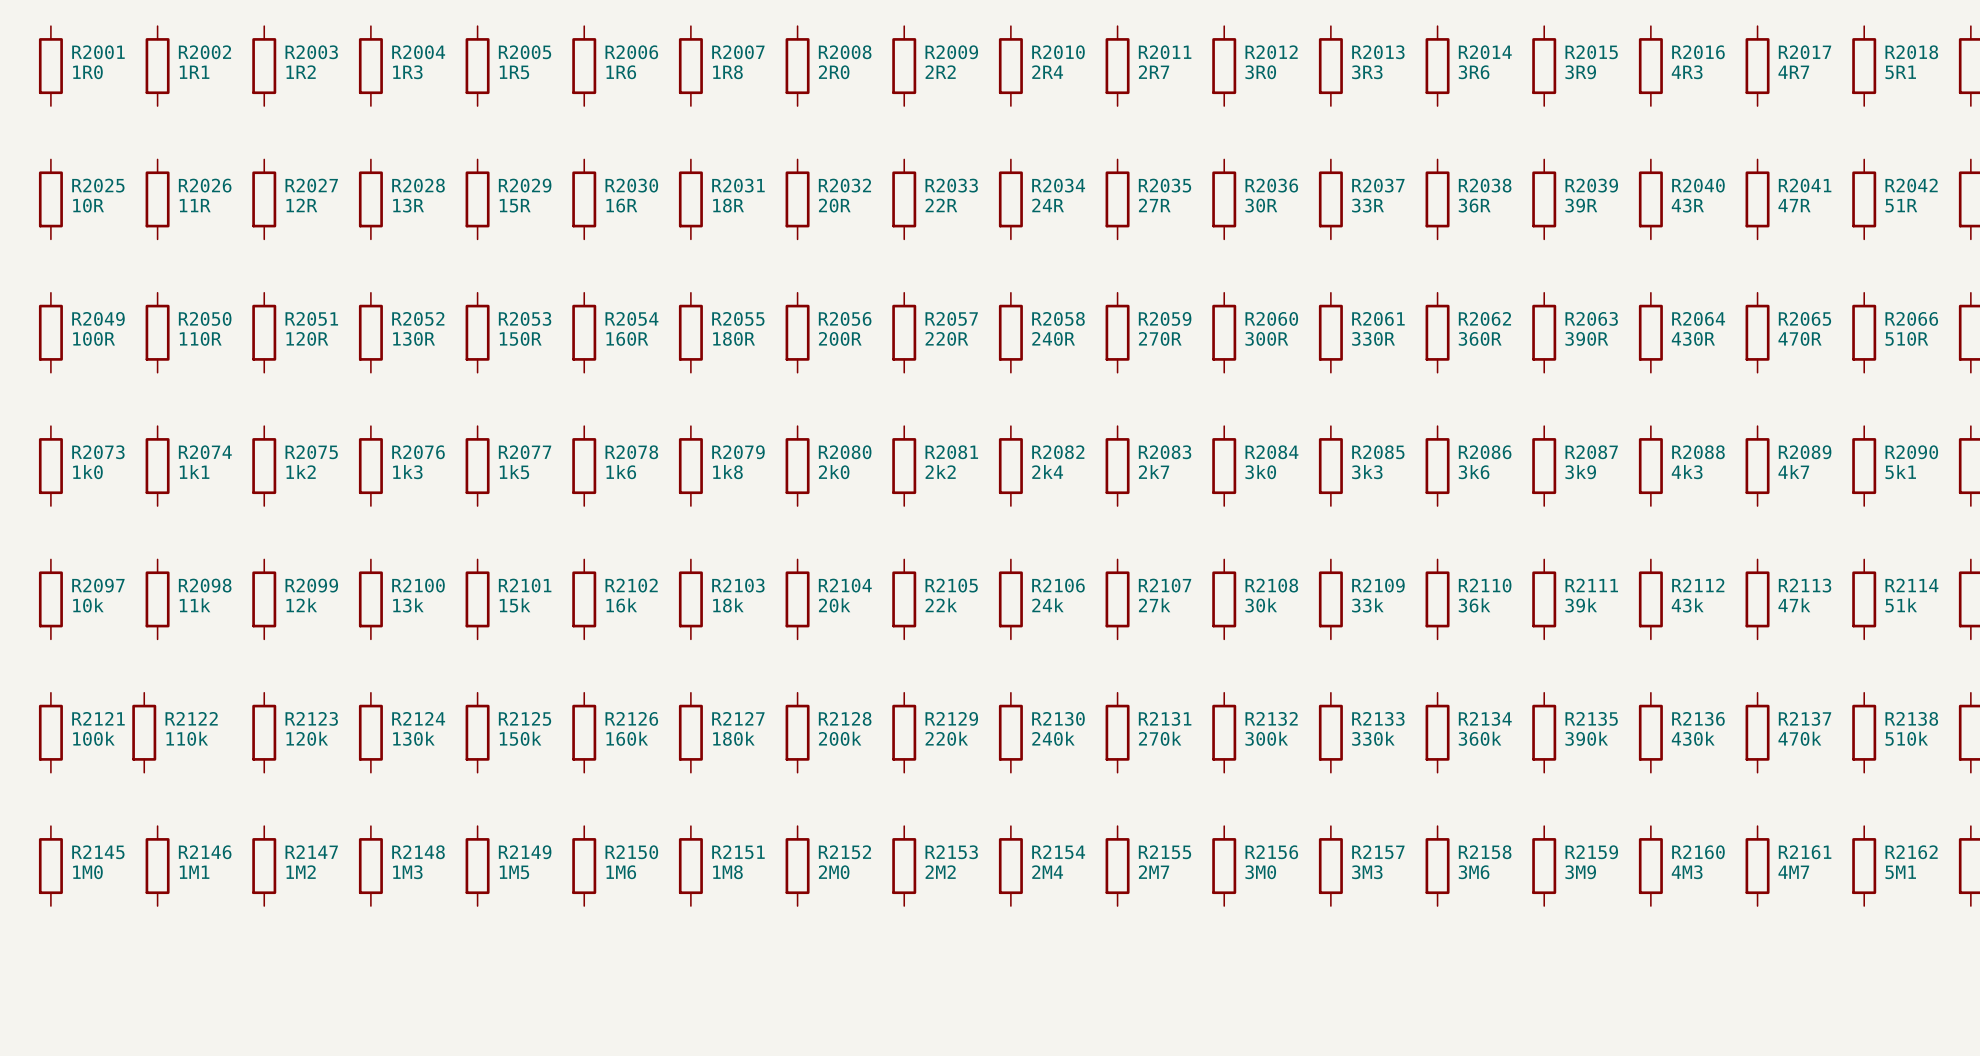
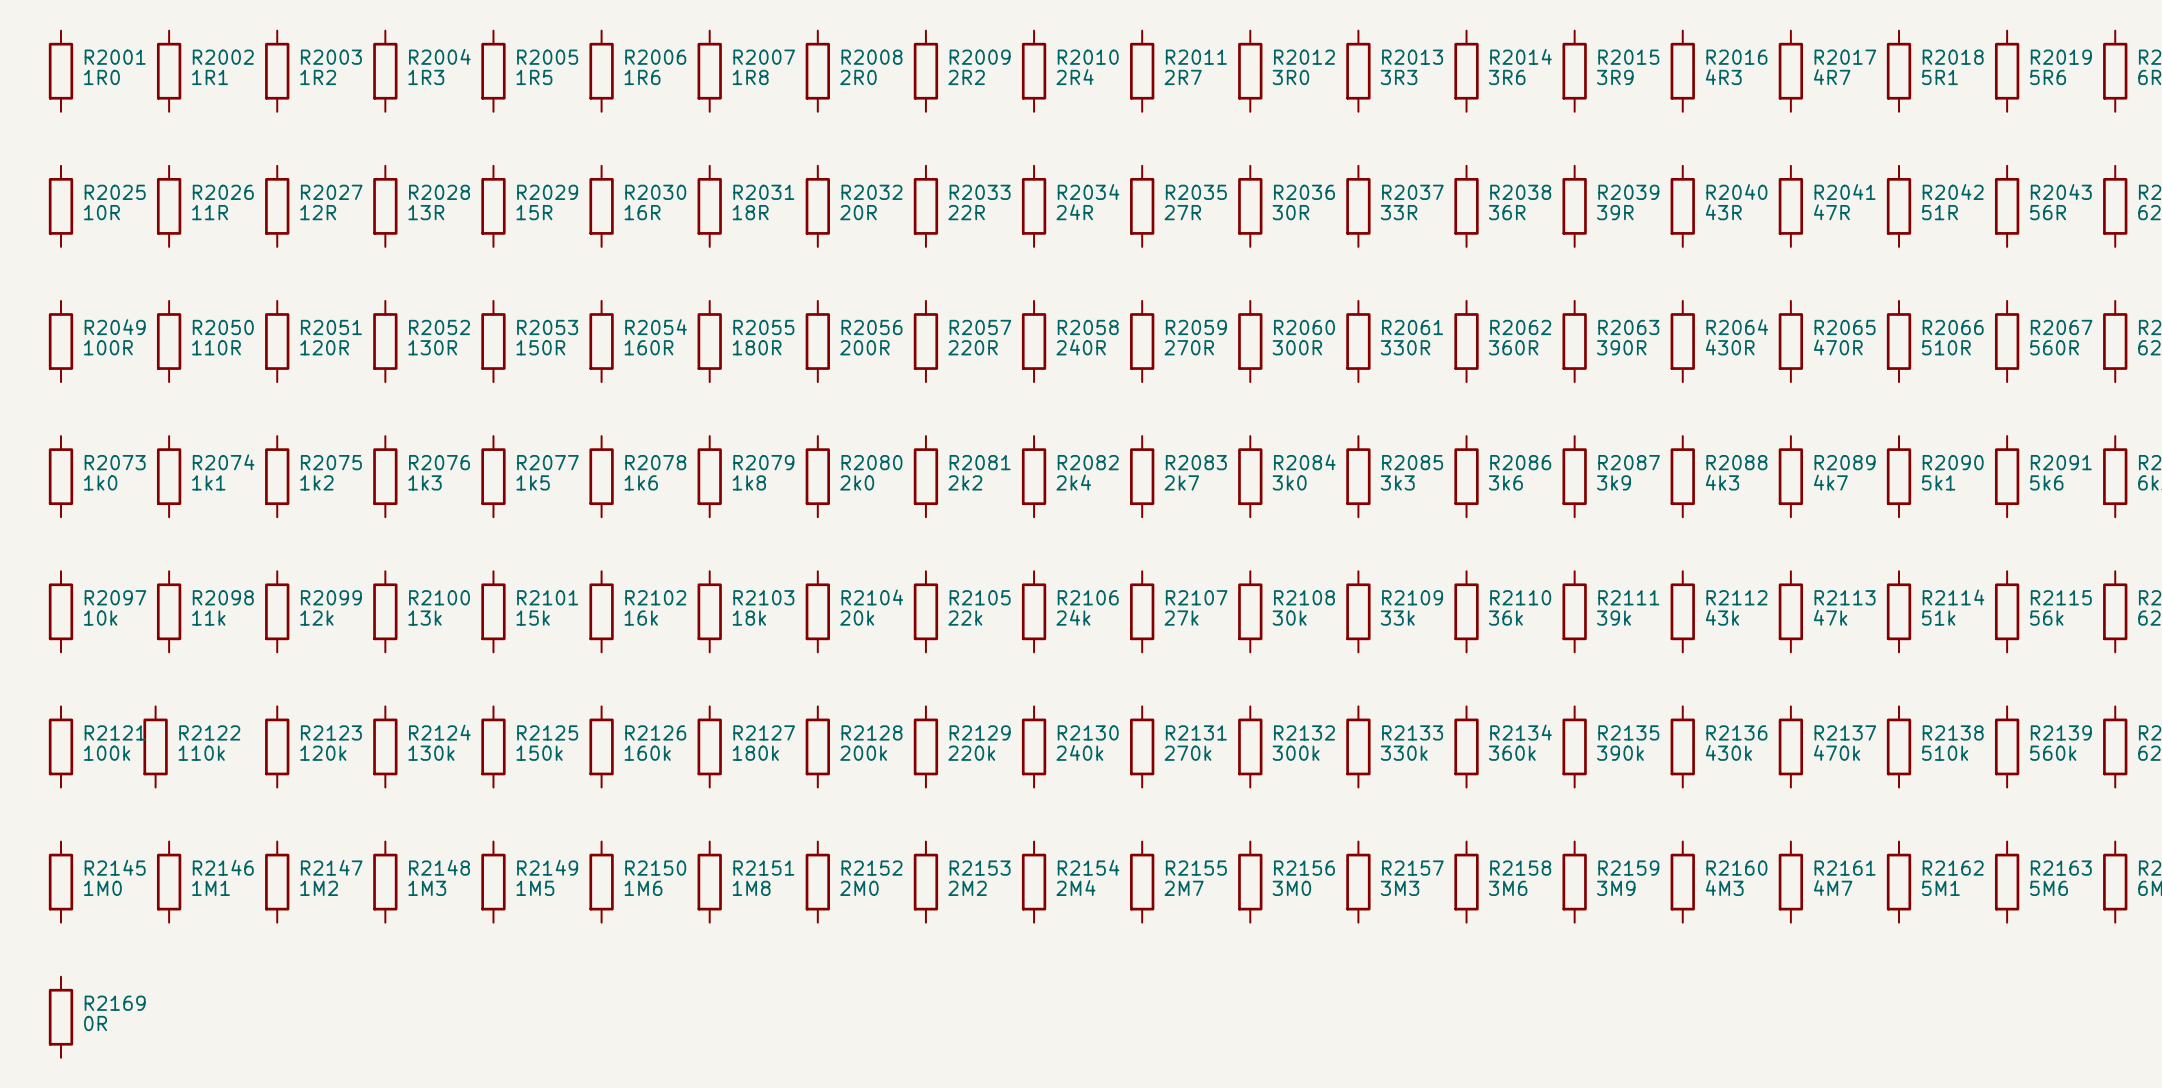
R2169: none -> 0R (60, 1017)

